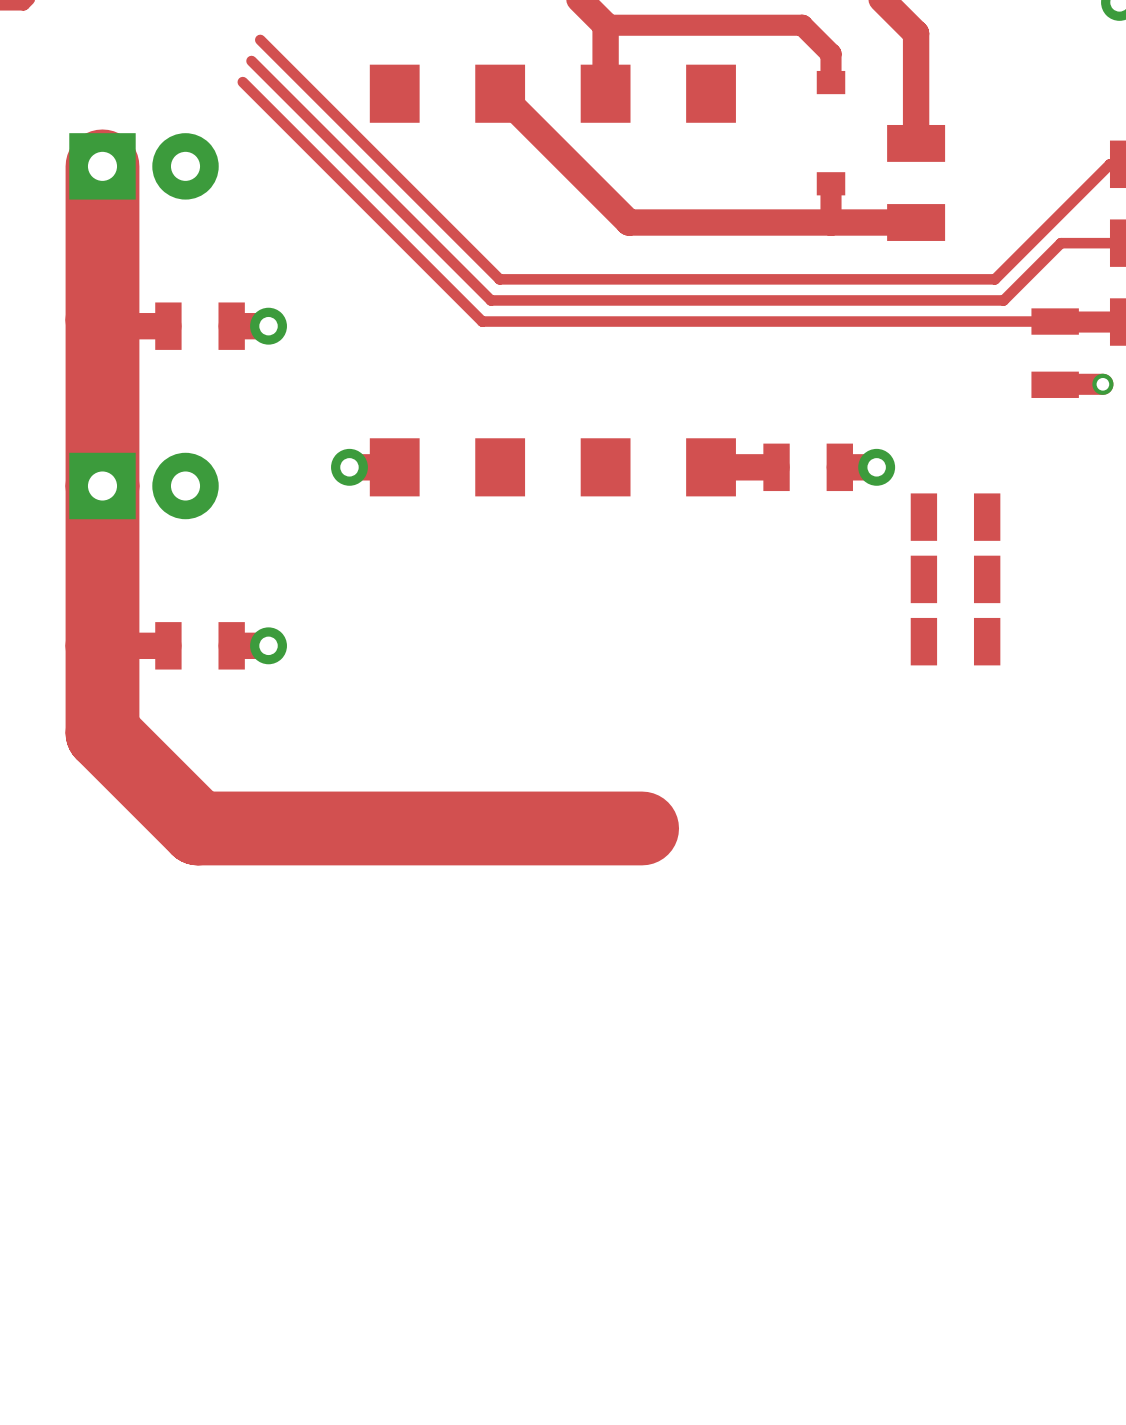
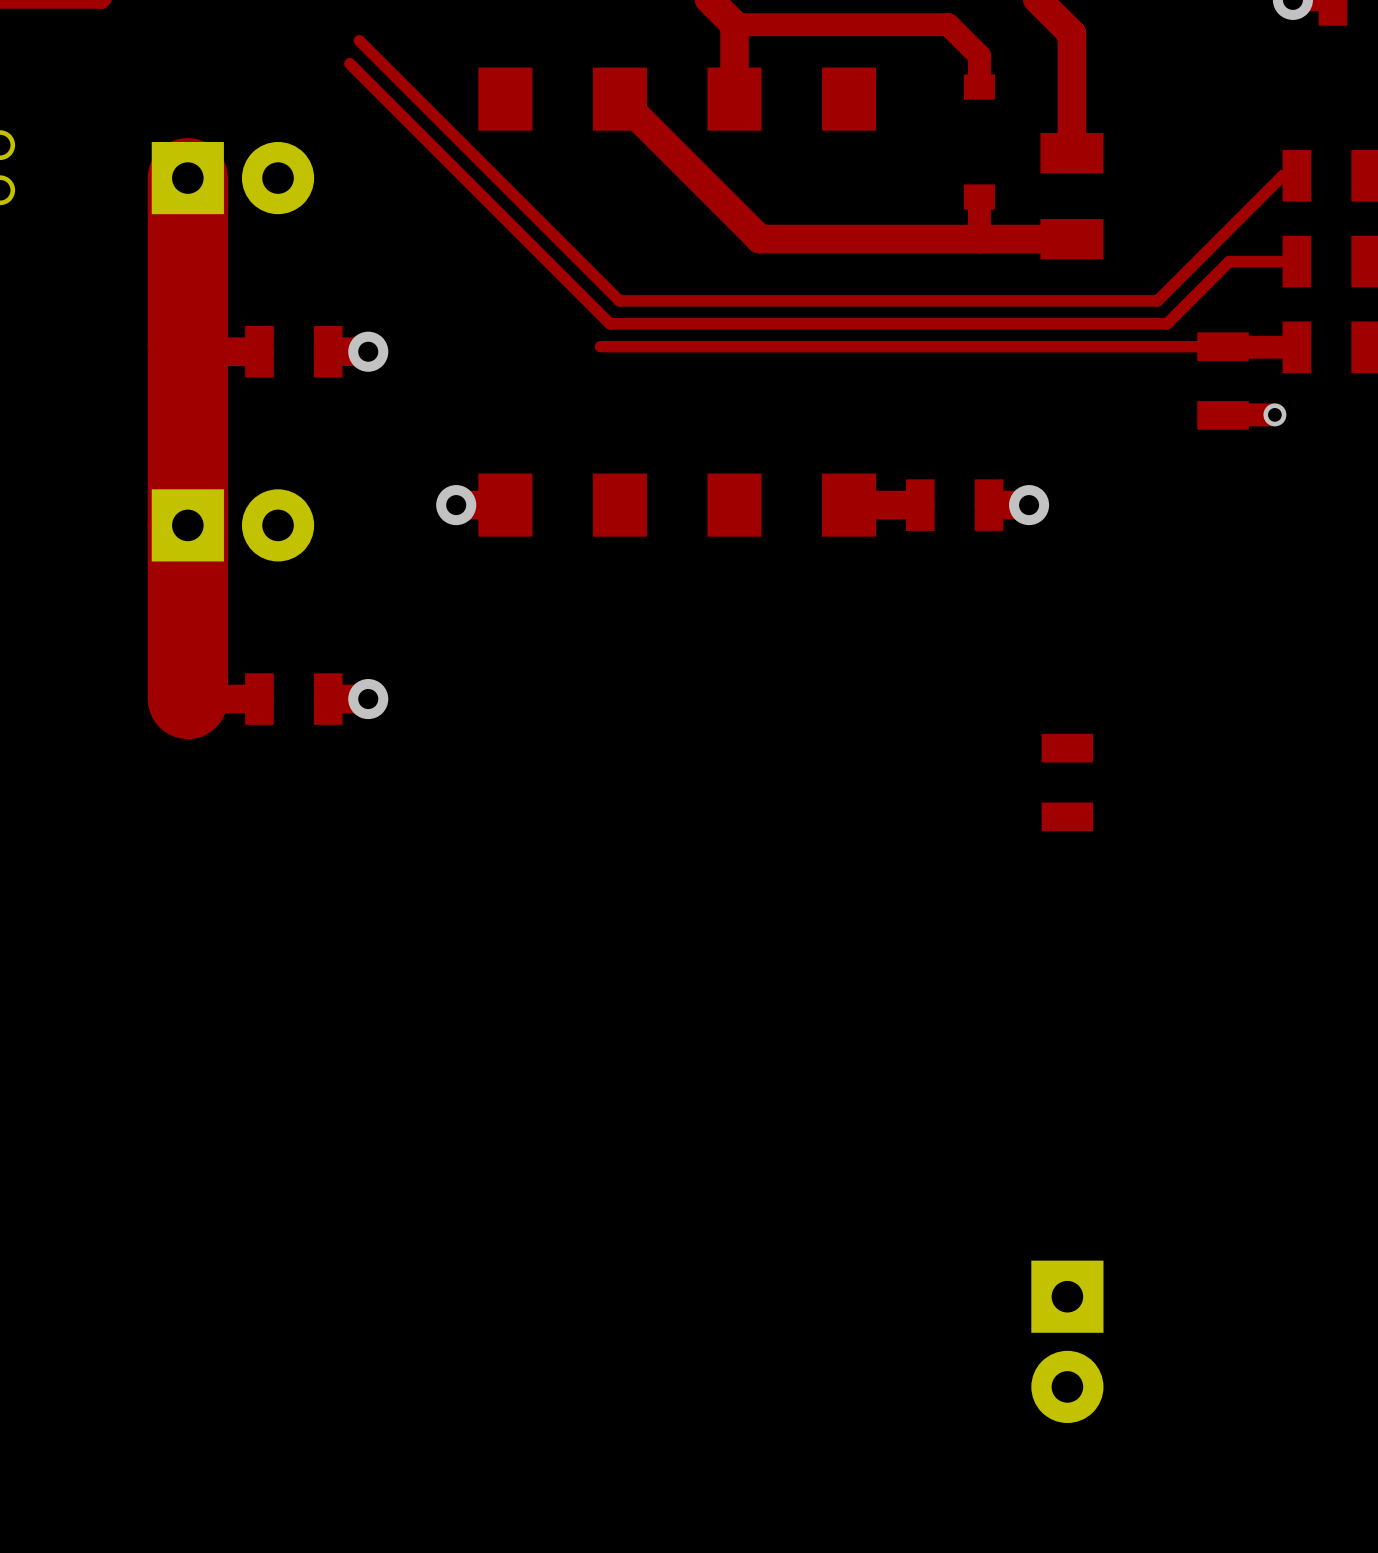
top track: (242, 82) (482, 321) -> none
part: (955, 517) -> none
part: (955, 579) -> none
part: (955, 641) -> none
top track: (102, 645) (102, 732) (197, 828) (642, 828) -> none
part: none -> (1067, 782)
part: none -> (1067, 1341)

